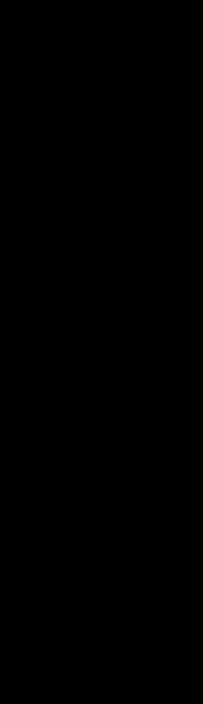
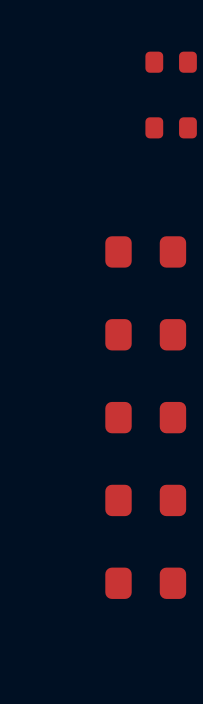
part: none -> (171, 62)
part: none -> (171, 127)
part: none -> (145, 251)
part: none -> (145, 334)
part: none -> (145, 417)
part: none -> (145, 500)
part: none -> (145, 583)

